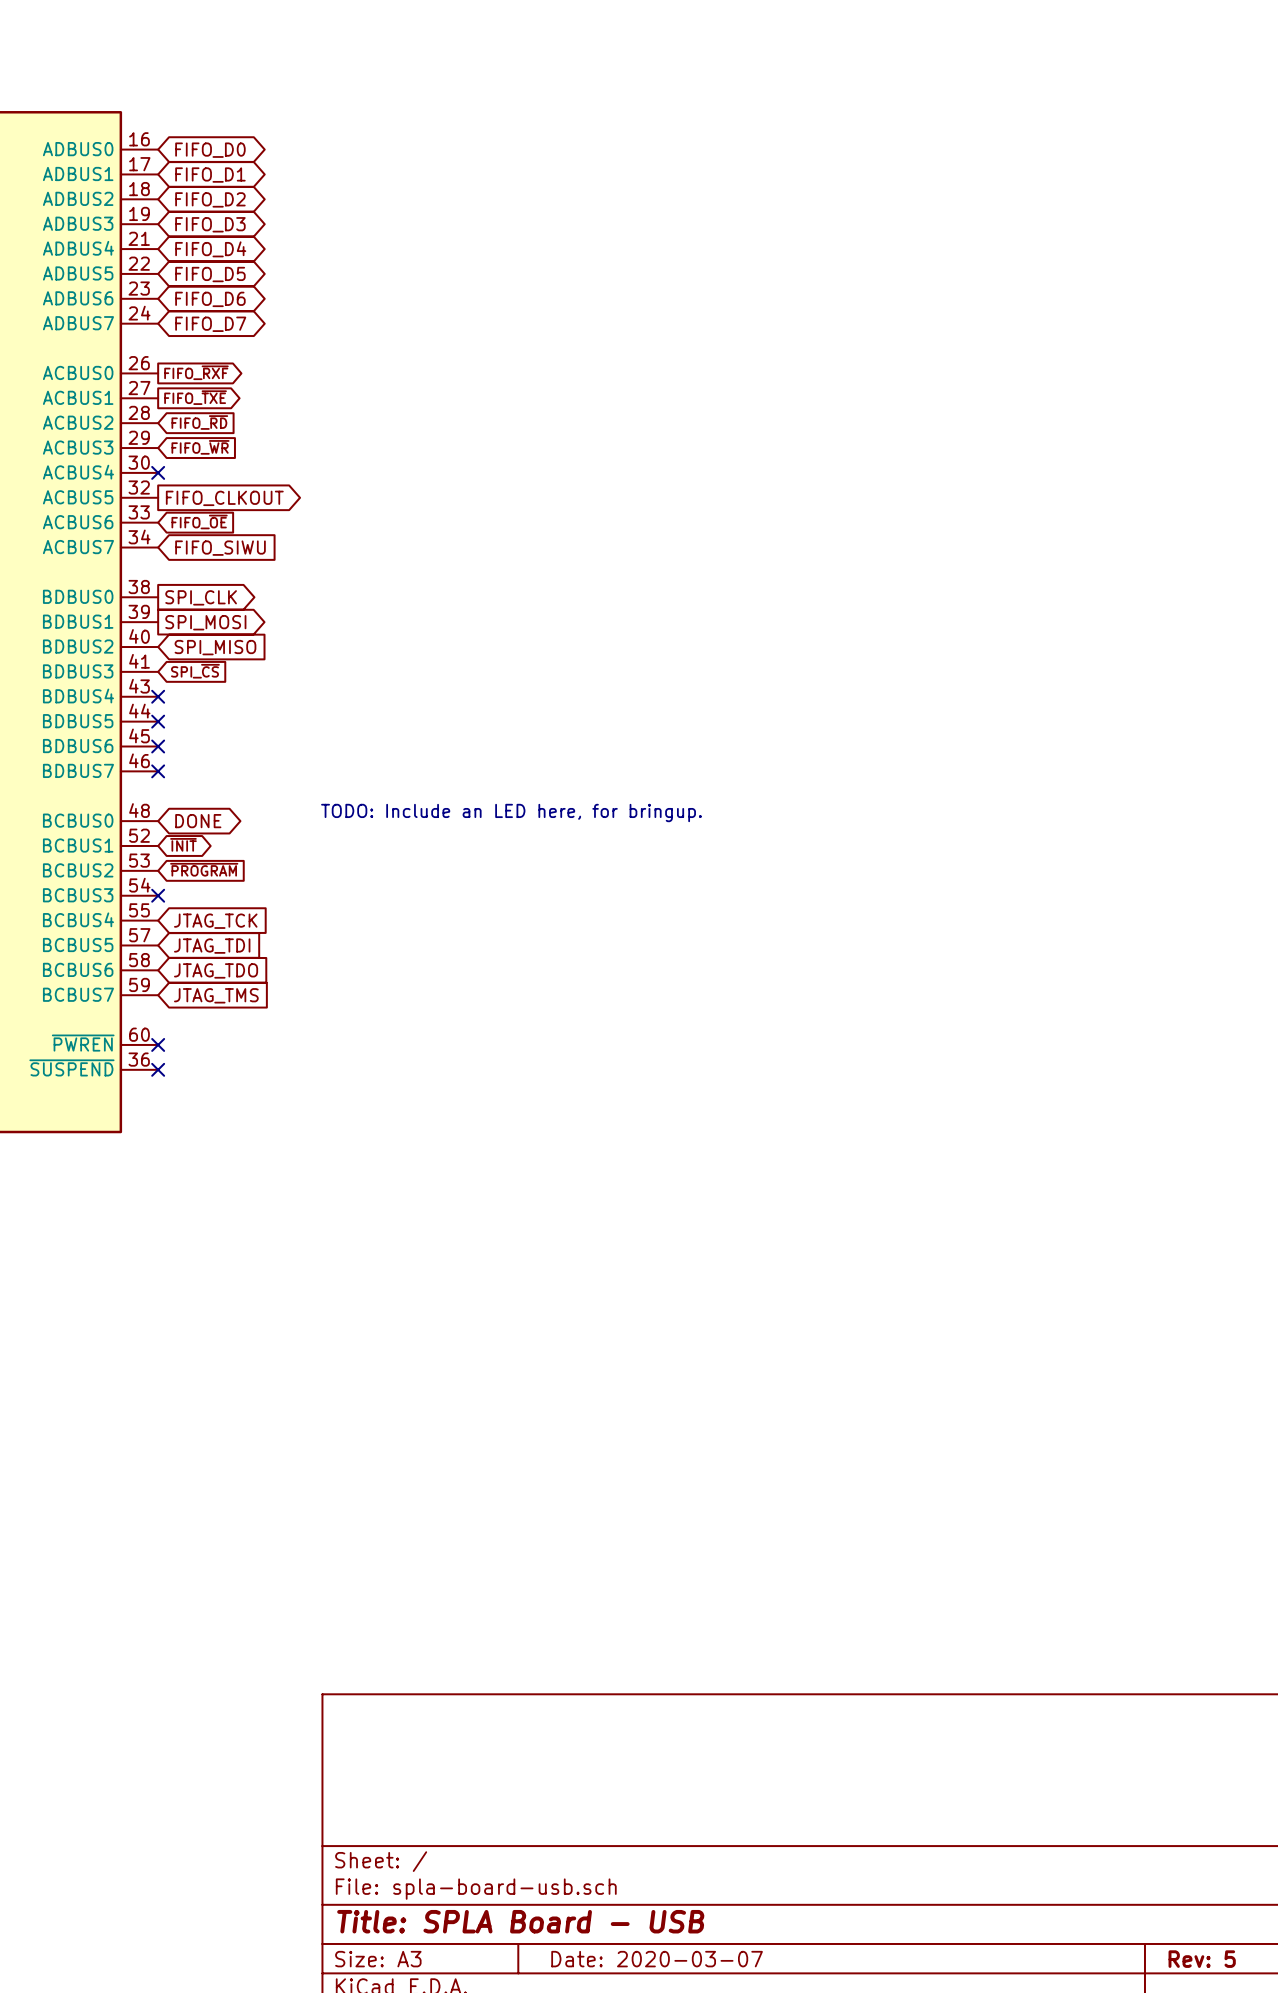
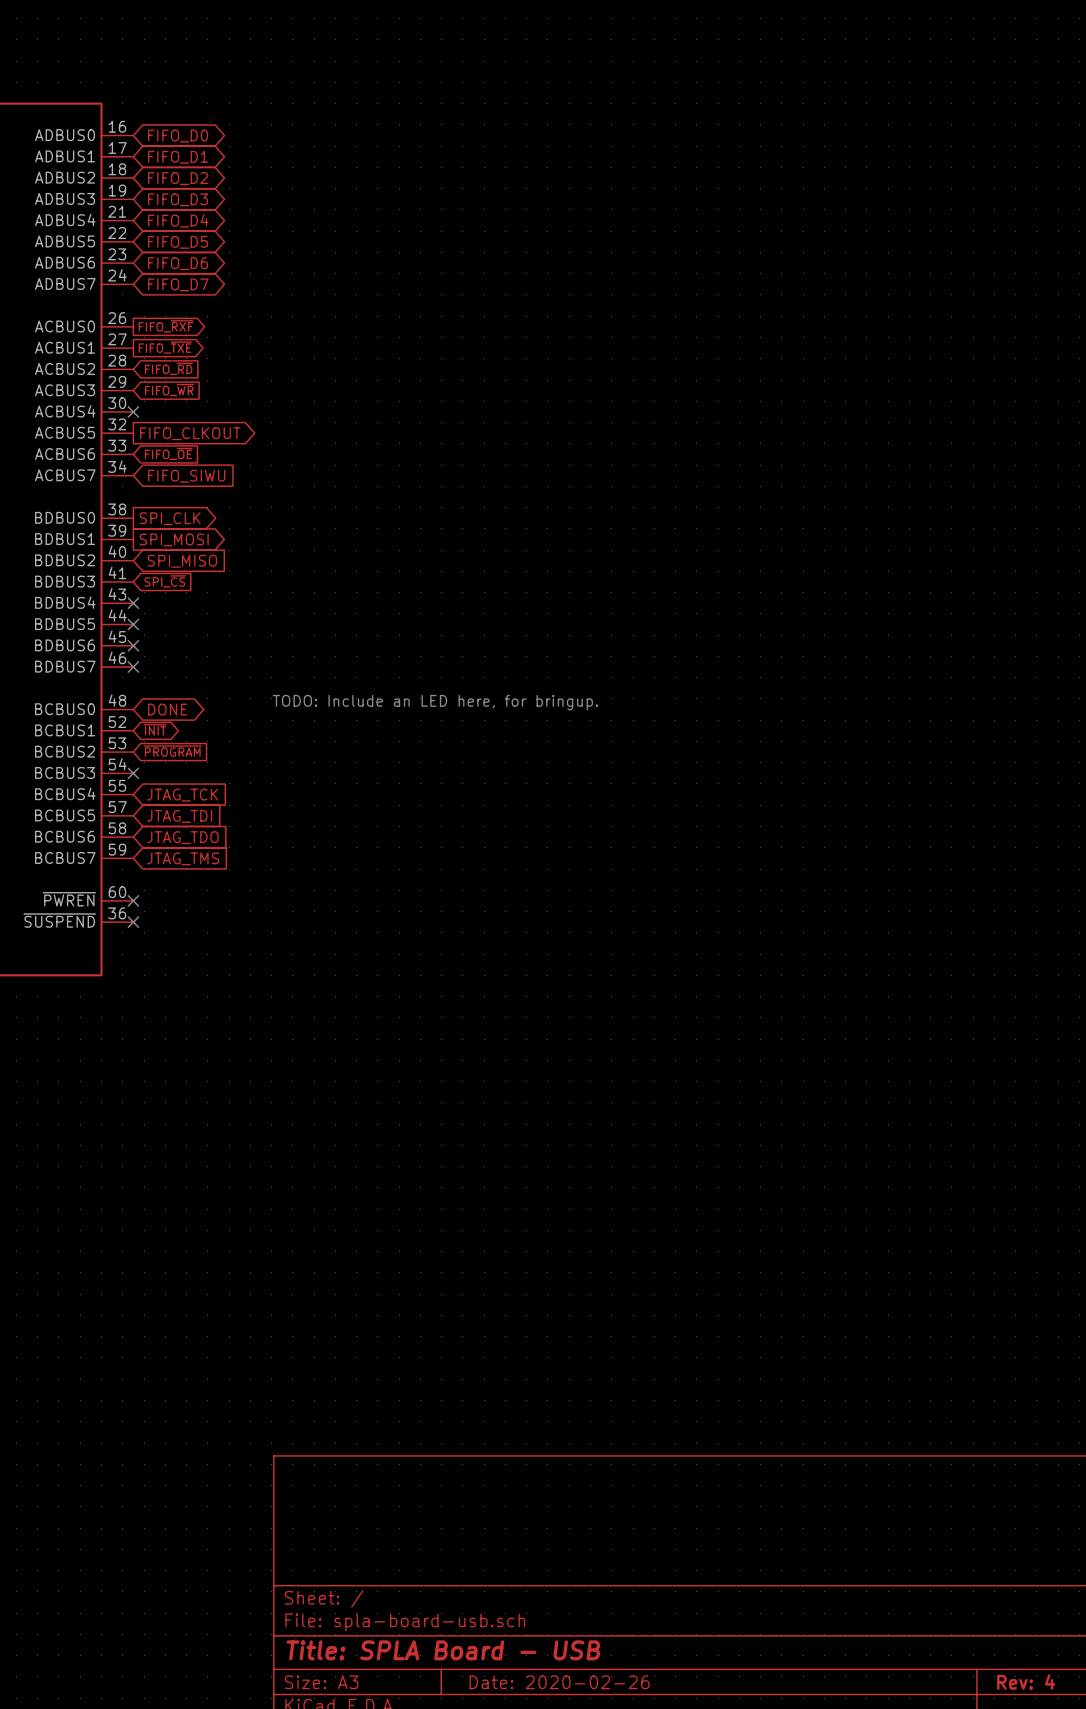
title block: Date: 2020-03-07 (657, 1959) -> Date: 2020-02-26 (559, 1682)
title block: Rev: 5 (1202, 1959) -> Rev: 4 (1026, 1682)

